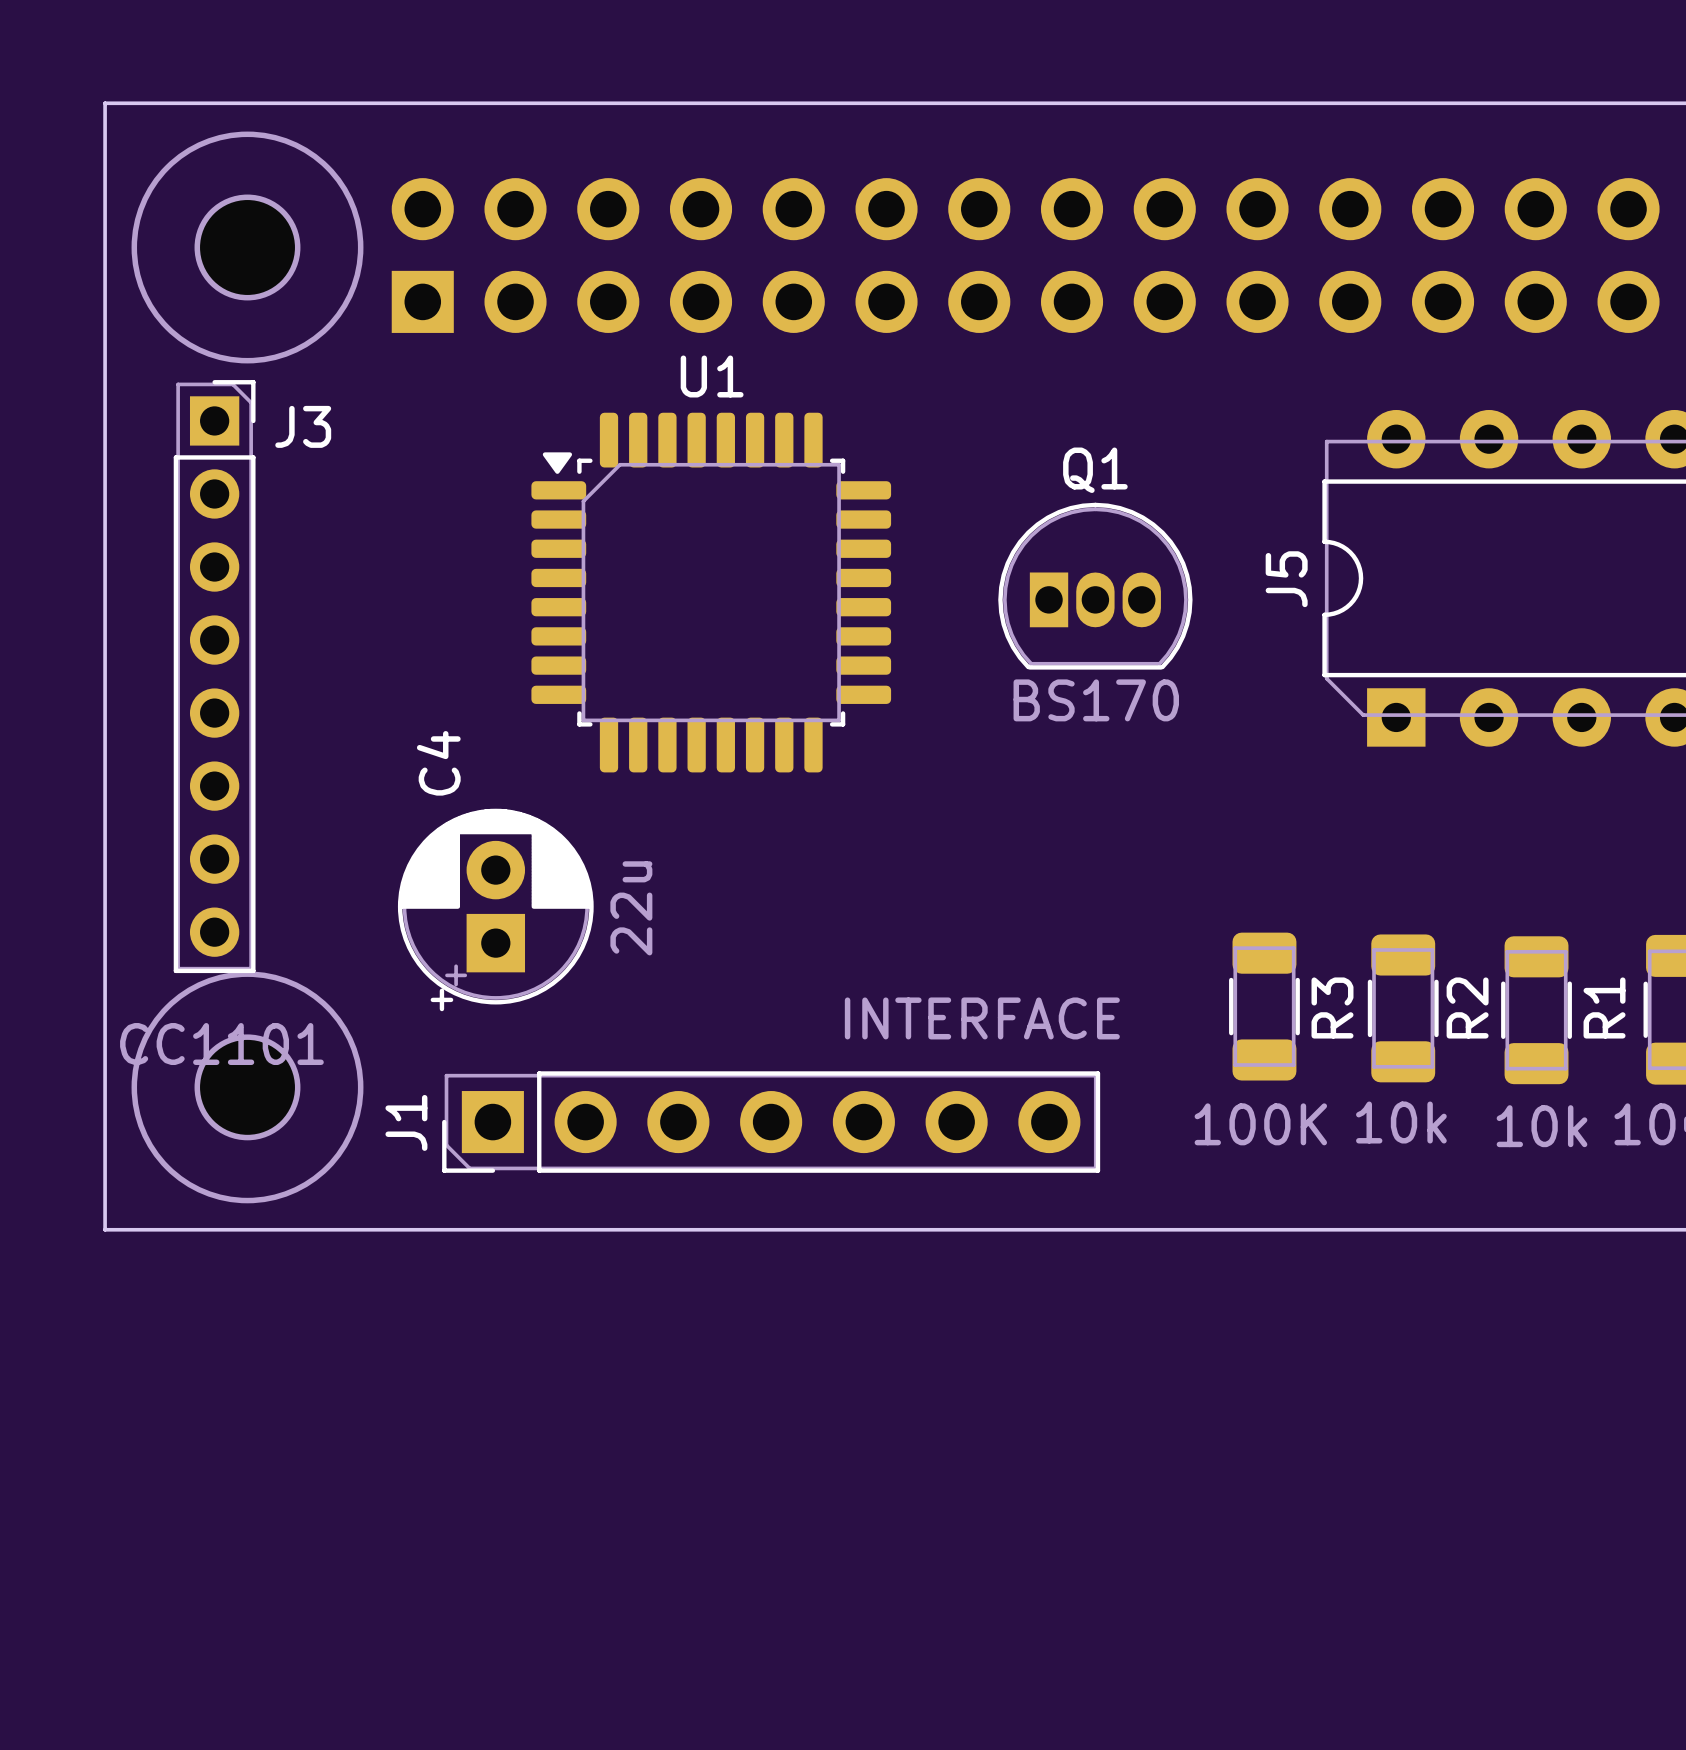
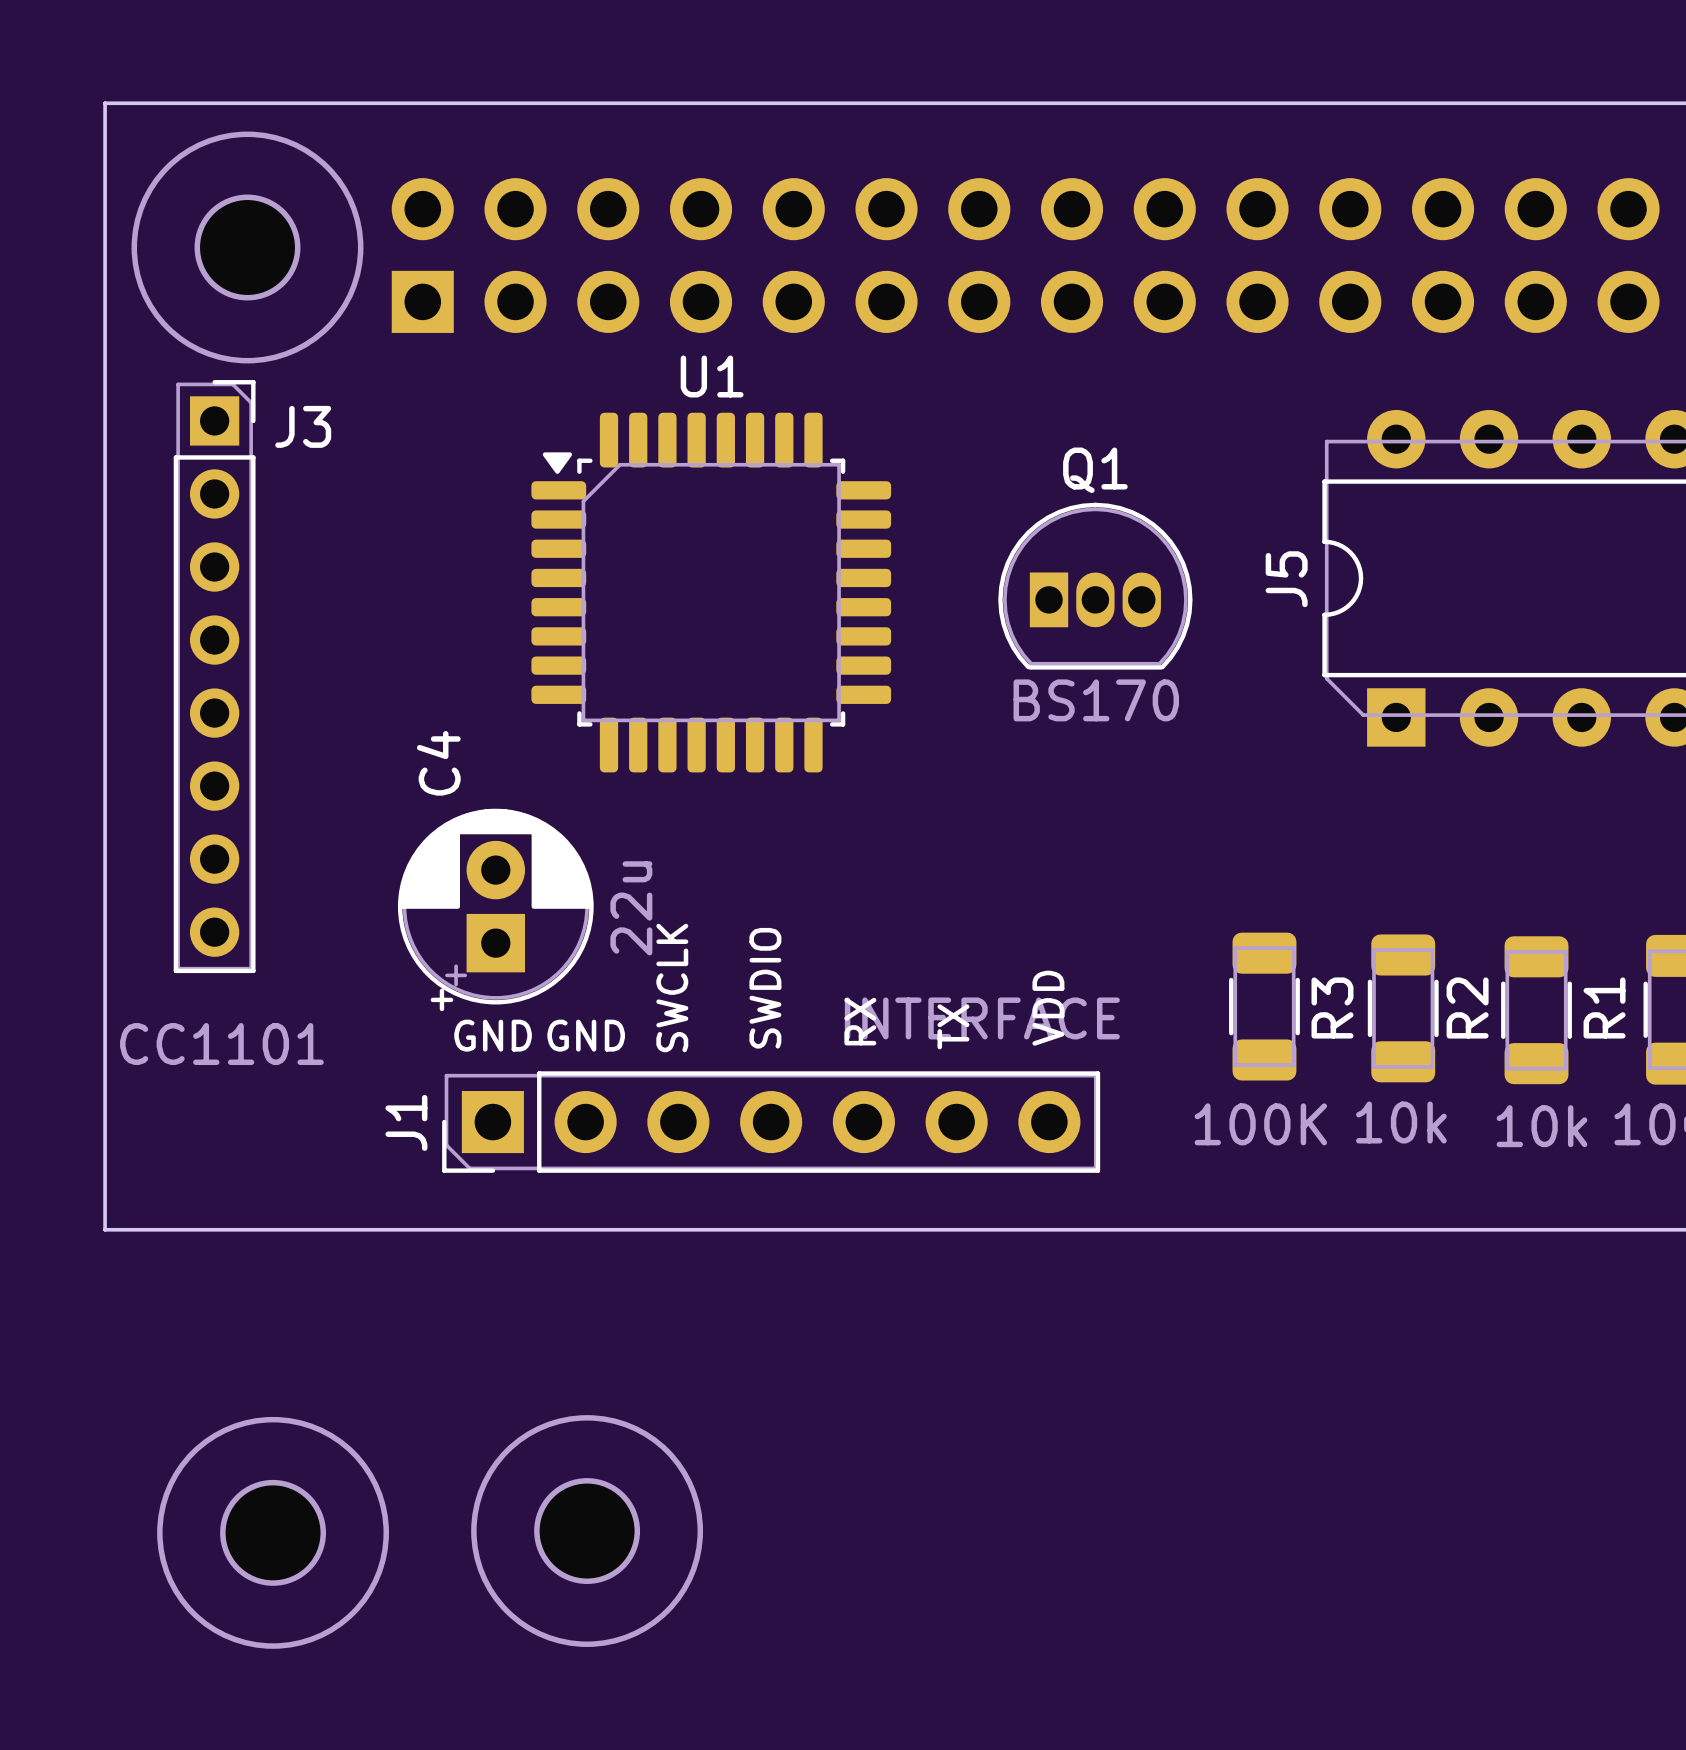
text: none -> SWCLK (672, 987)
text: none -> SWDIO (765, 988)
text: none -> VDD (1048, 1008)
text: none -> RX (860, 1021)
text: none -> TX (953, 1026)
text: none -> GND (493, 1035)
text: none -> GND (586, 1035)
part: (247, 1087) -> none
part: none -> (587, 1531)
part: none -> (273, 1532)

